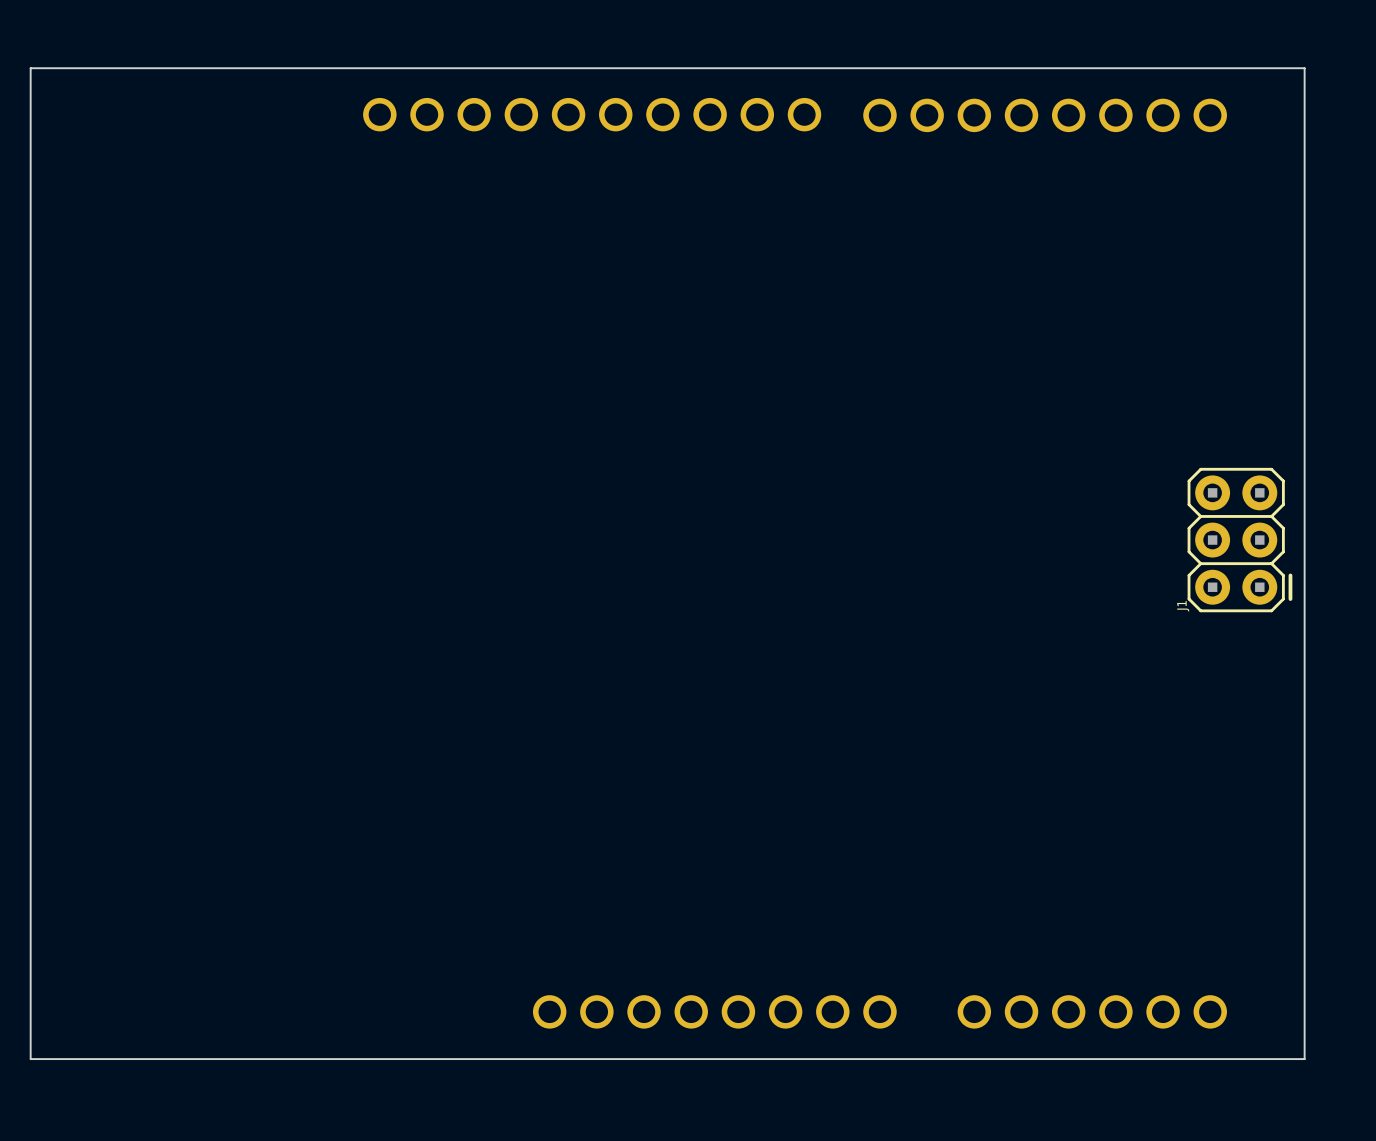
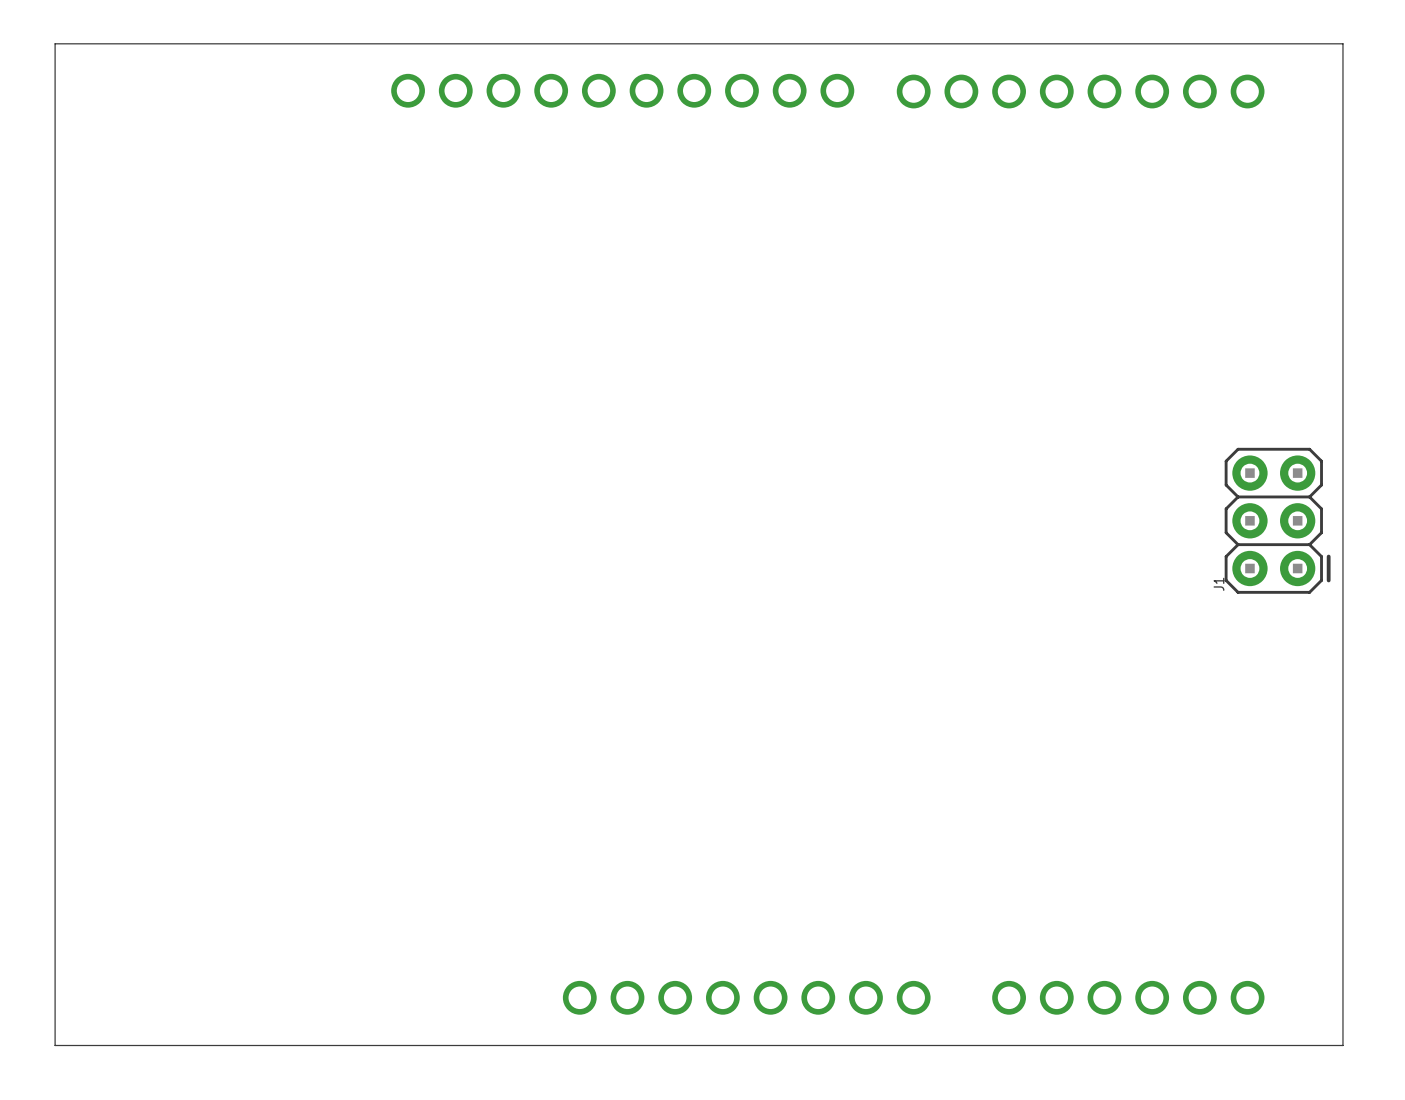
board edge: (30, 68) (1304, 68) (1304, 1059) (30, 1059) (30, 68) -> none
line: none -> (55, 43) (1342, 43) (1342, 1045) (55, 1045) (55, 43)

